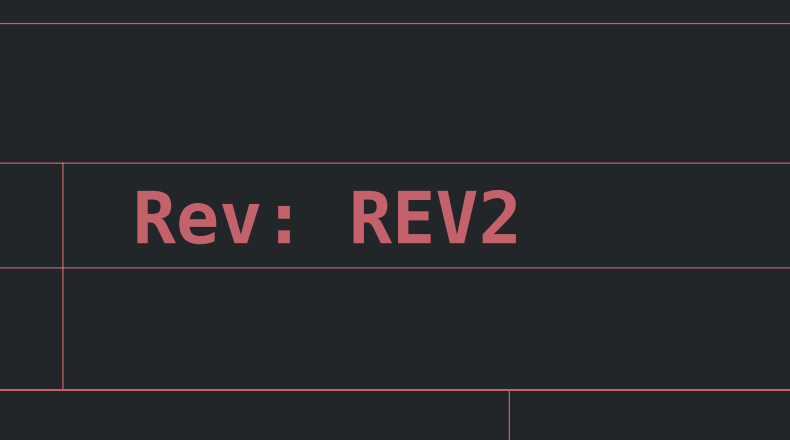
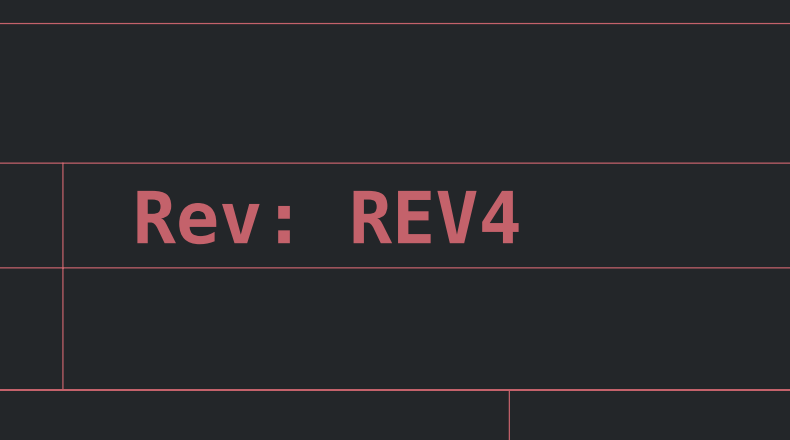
title block: Rev: REV2 (326, 217) -> Rev: REV4 (328, 217)

